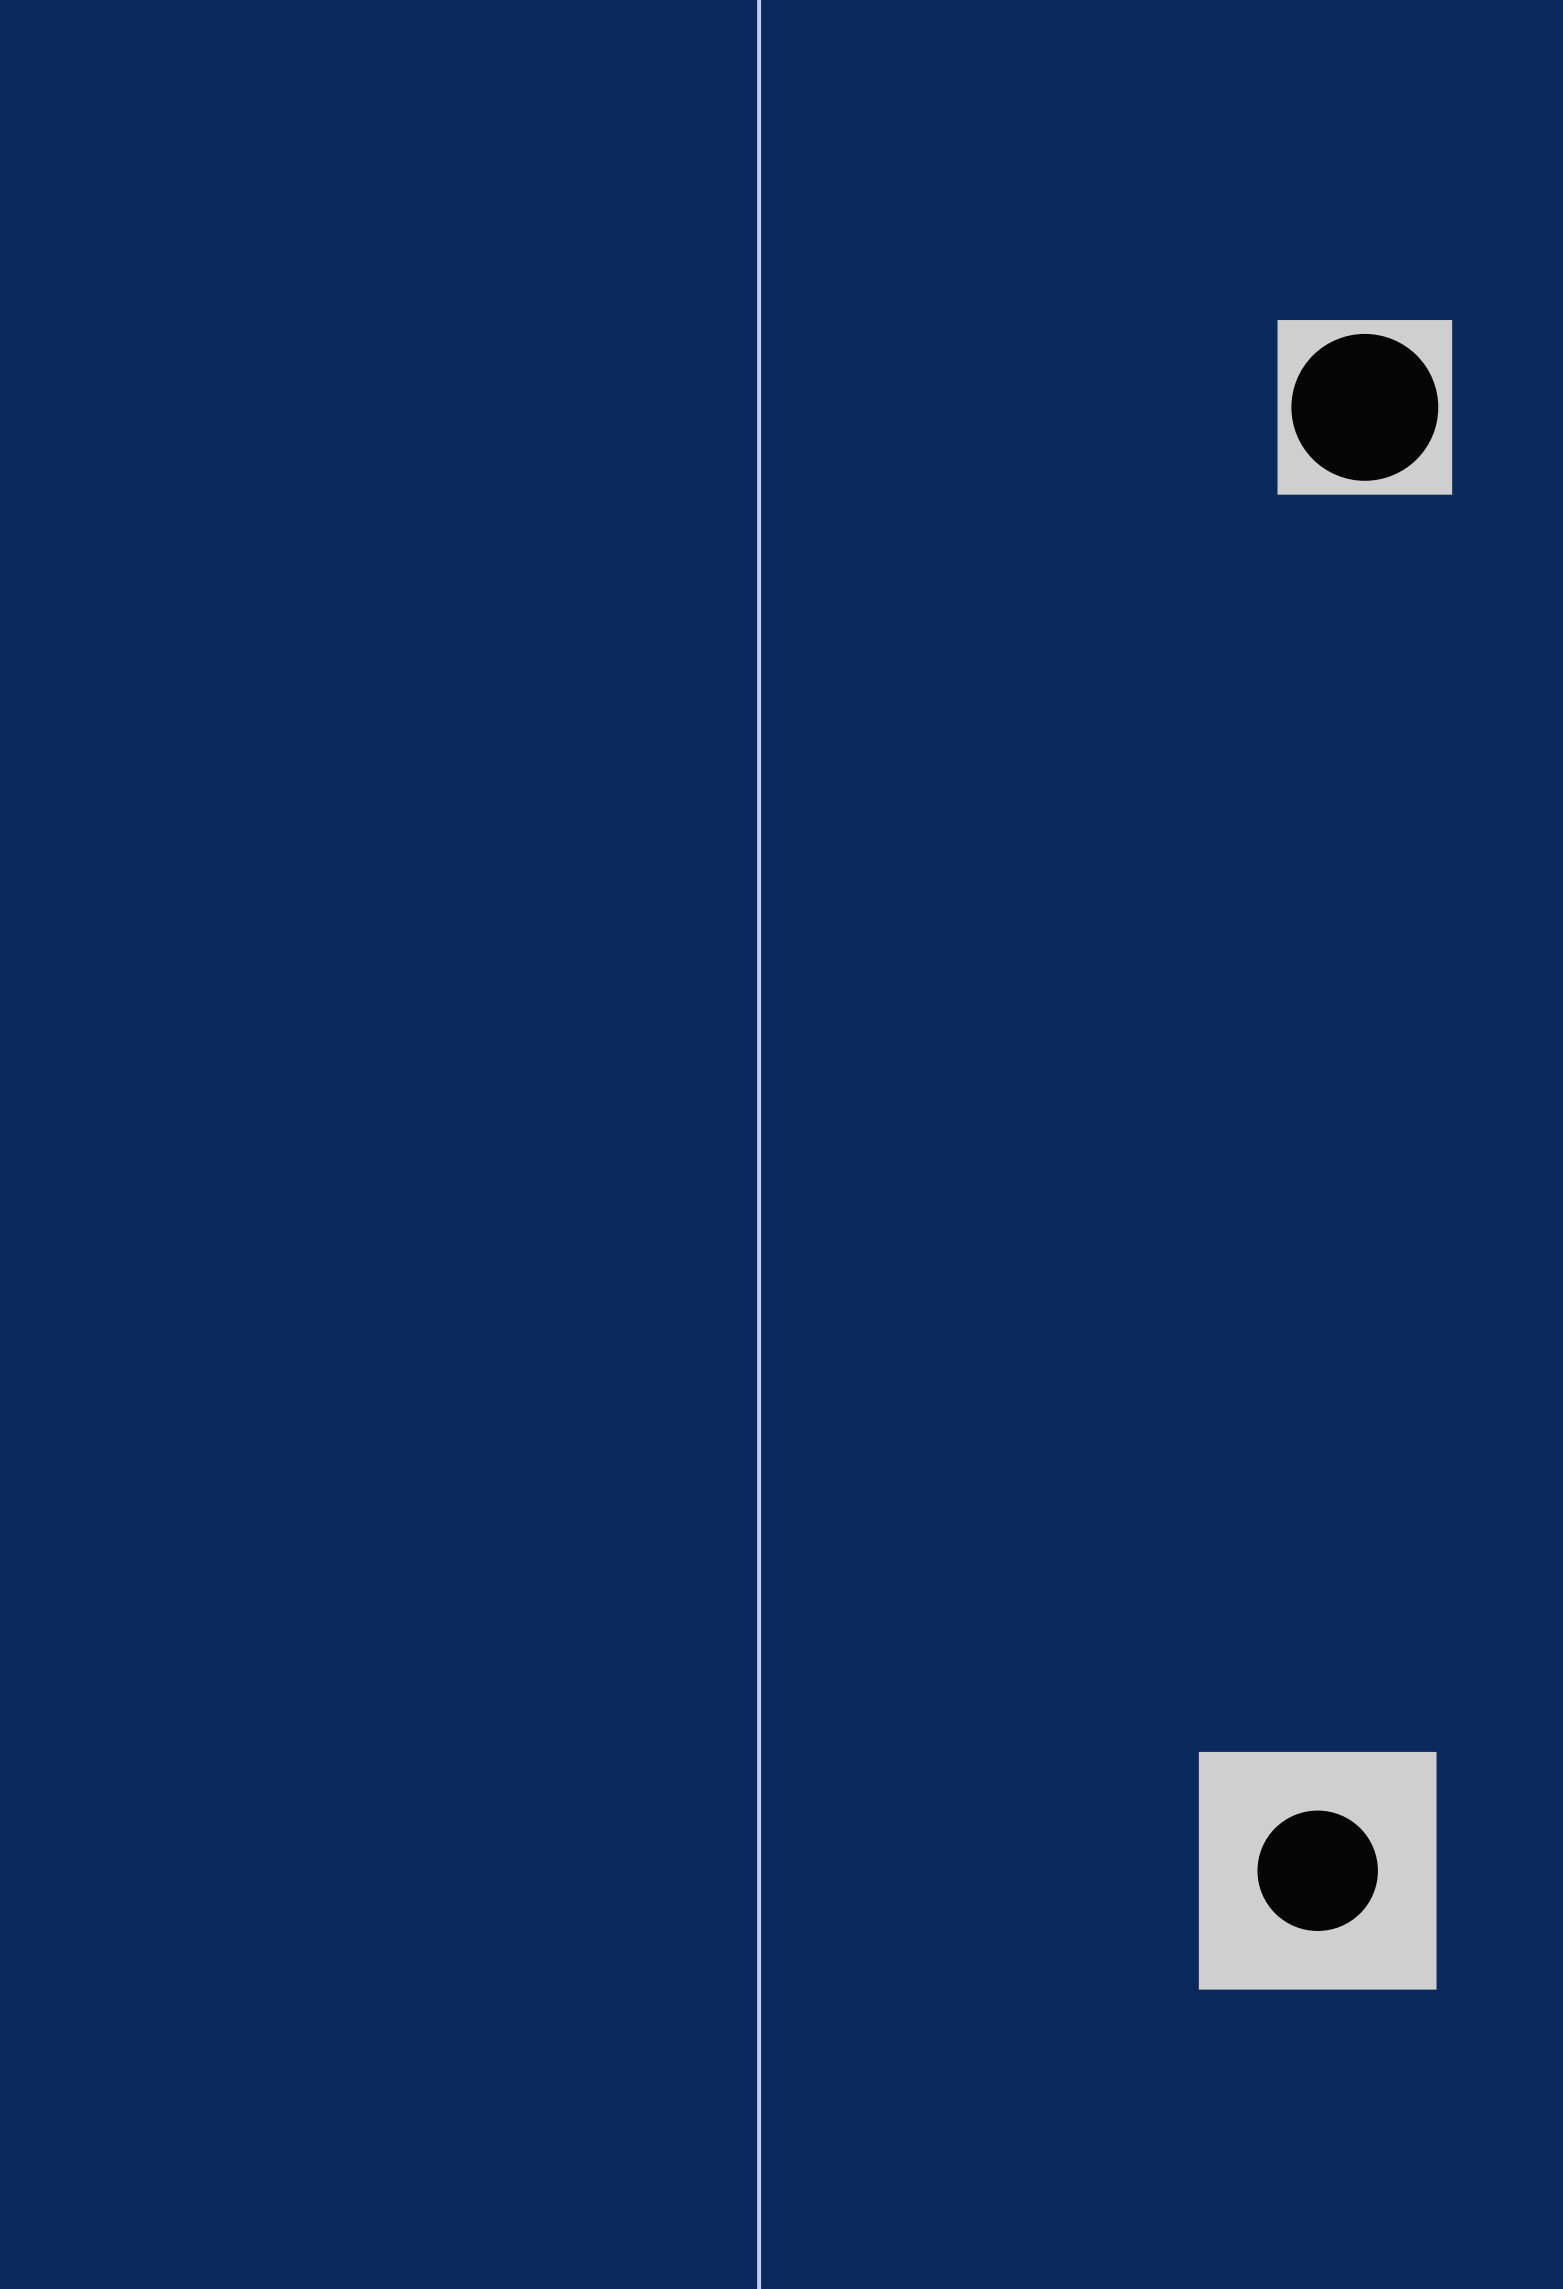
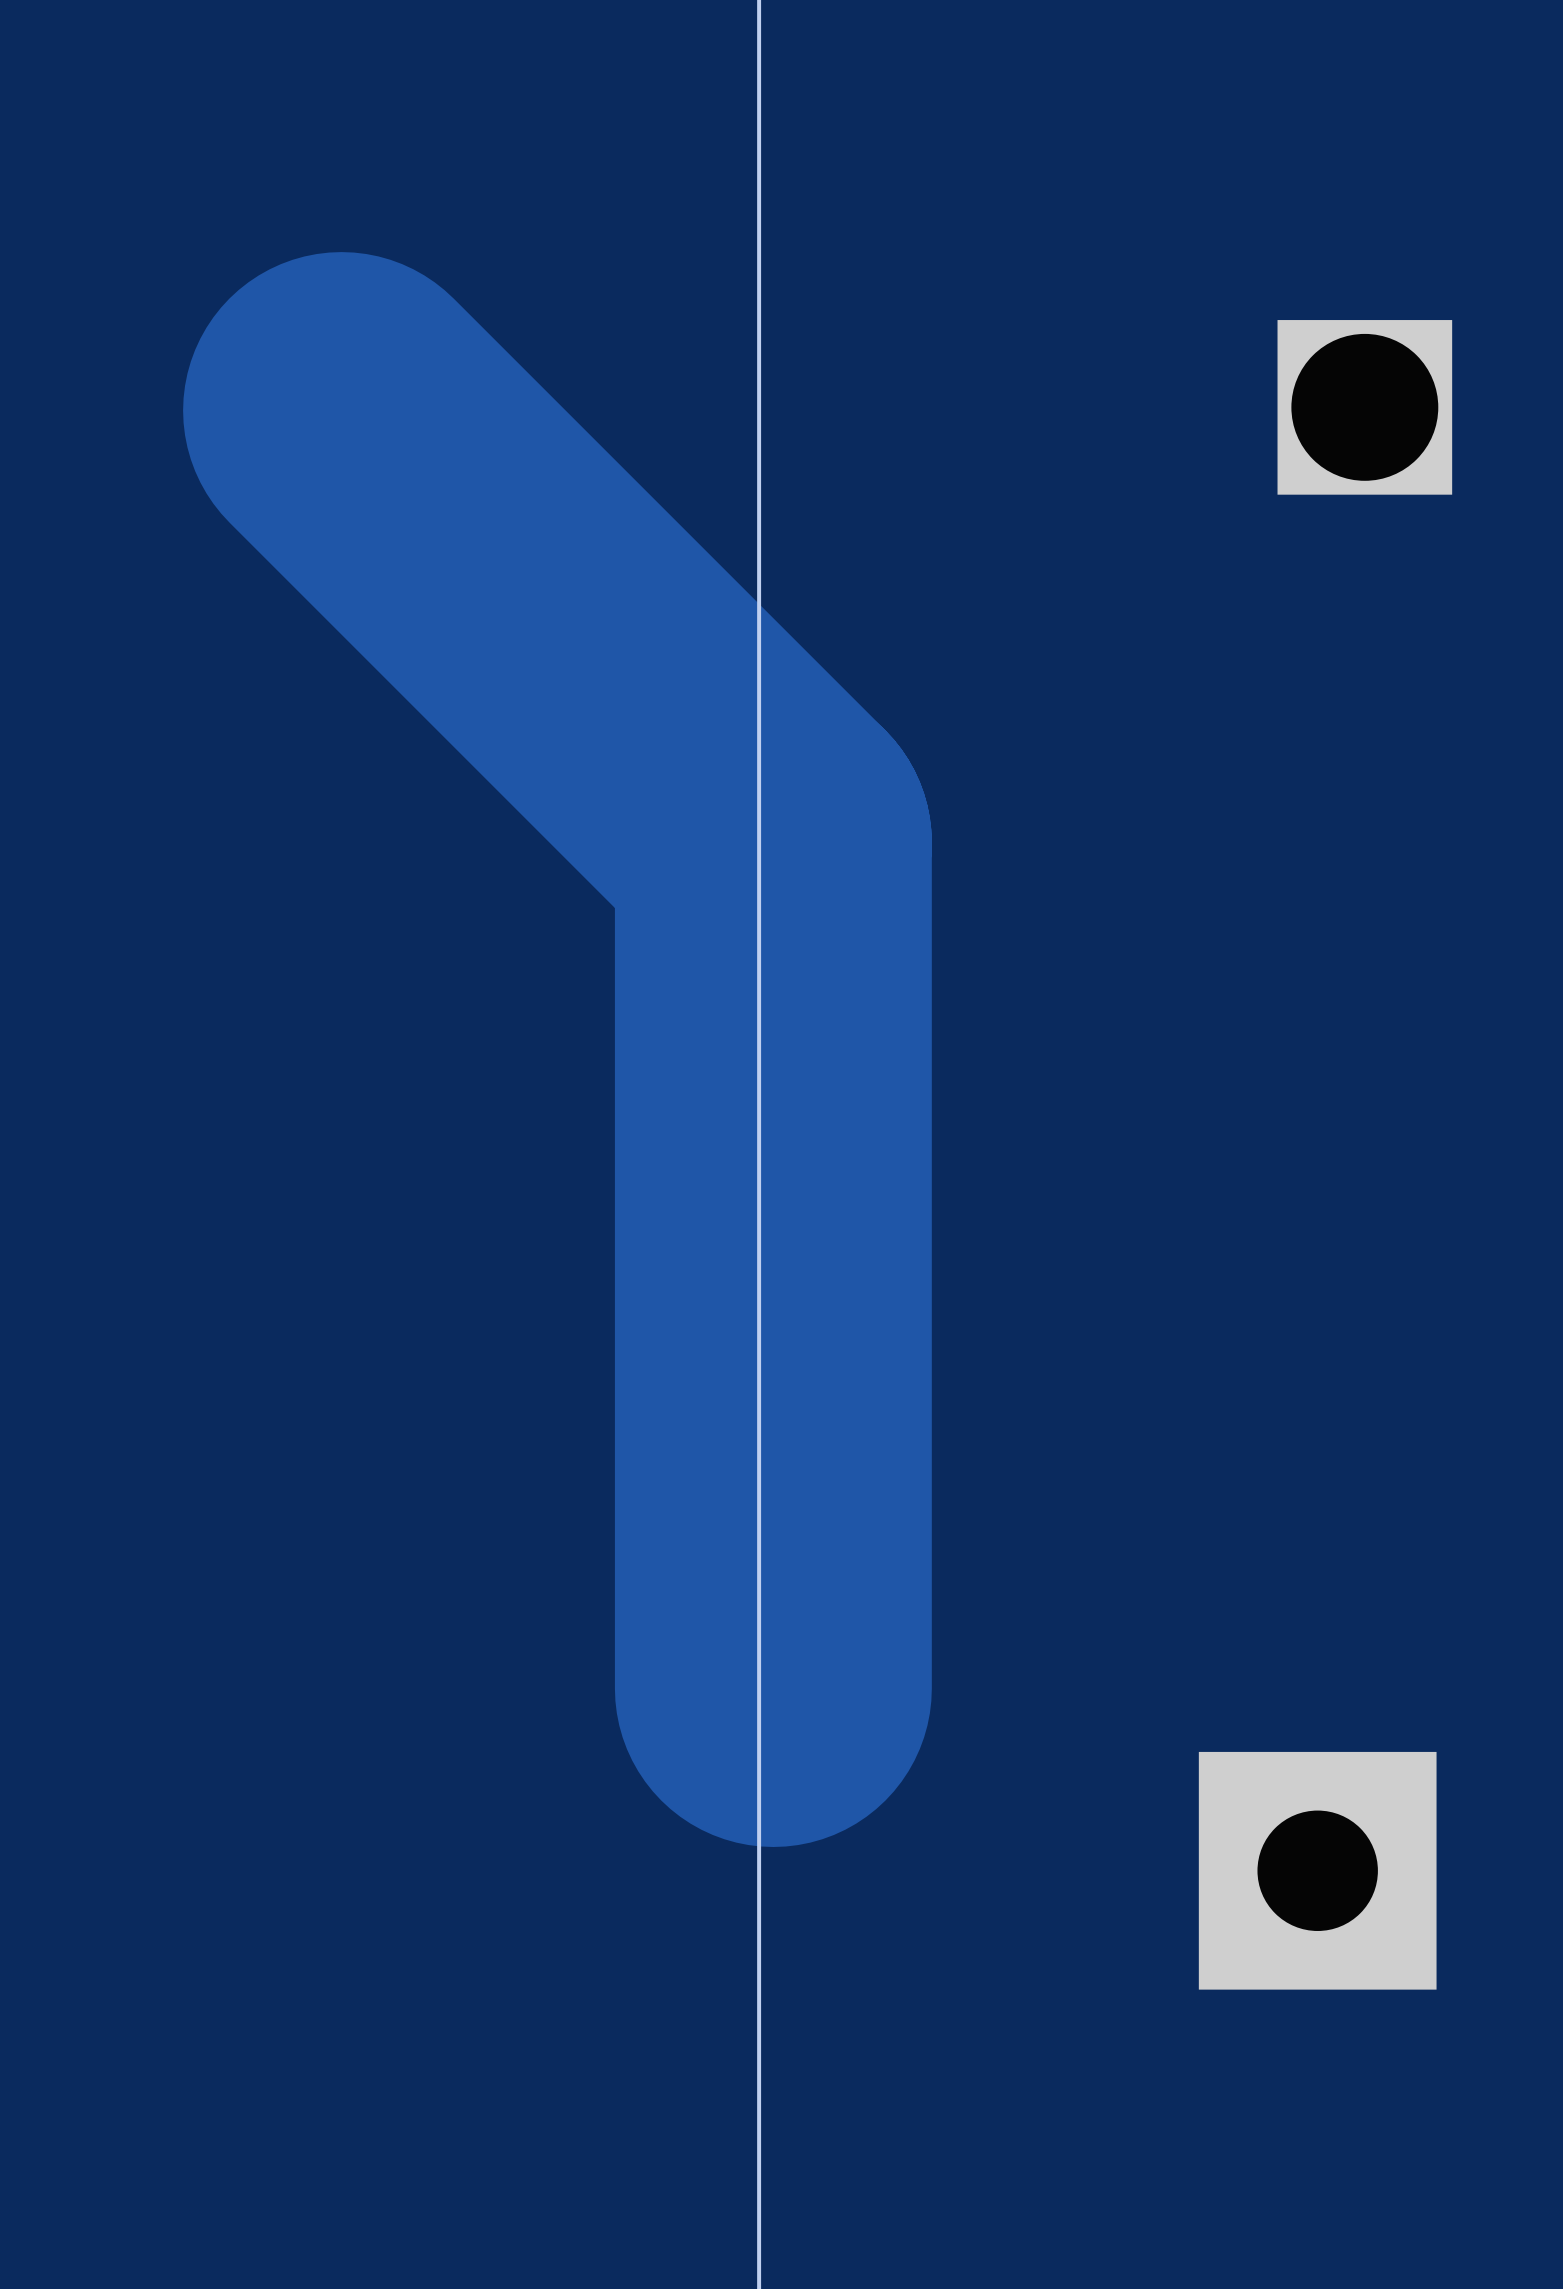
track: none -> (341, 410) (773, 842) (773, 1688)

